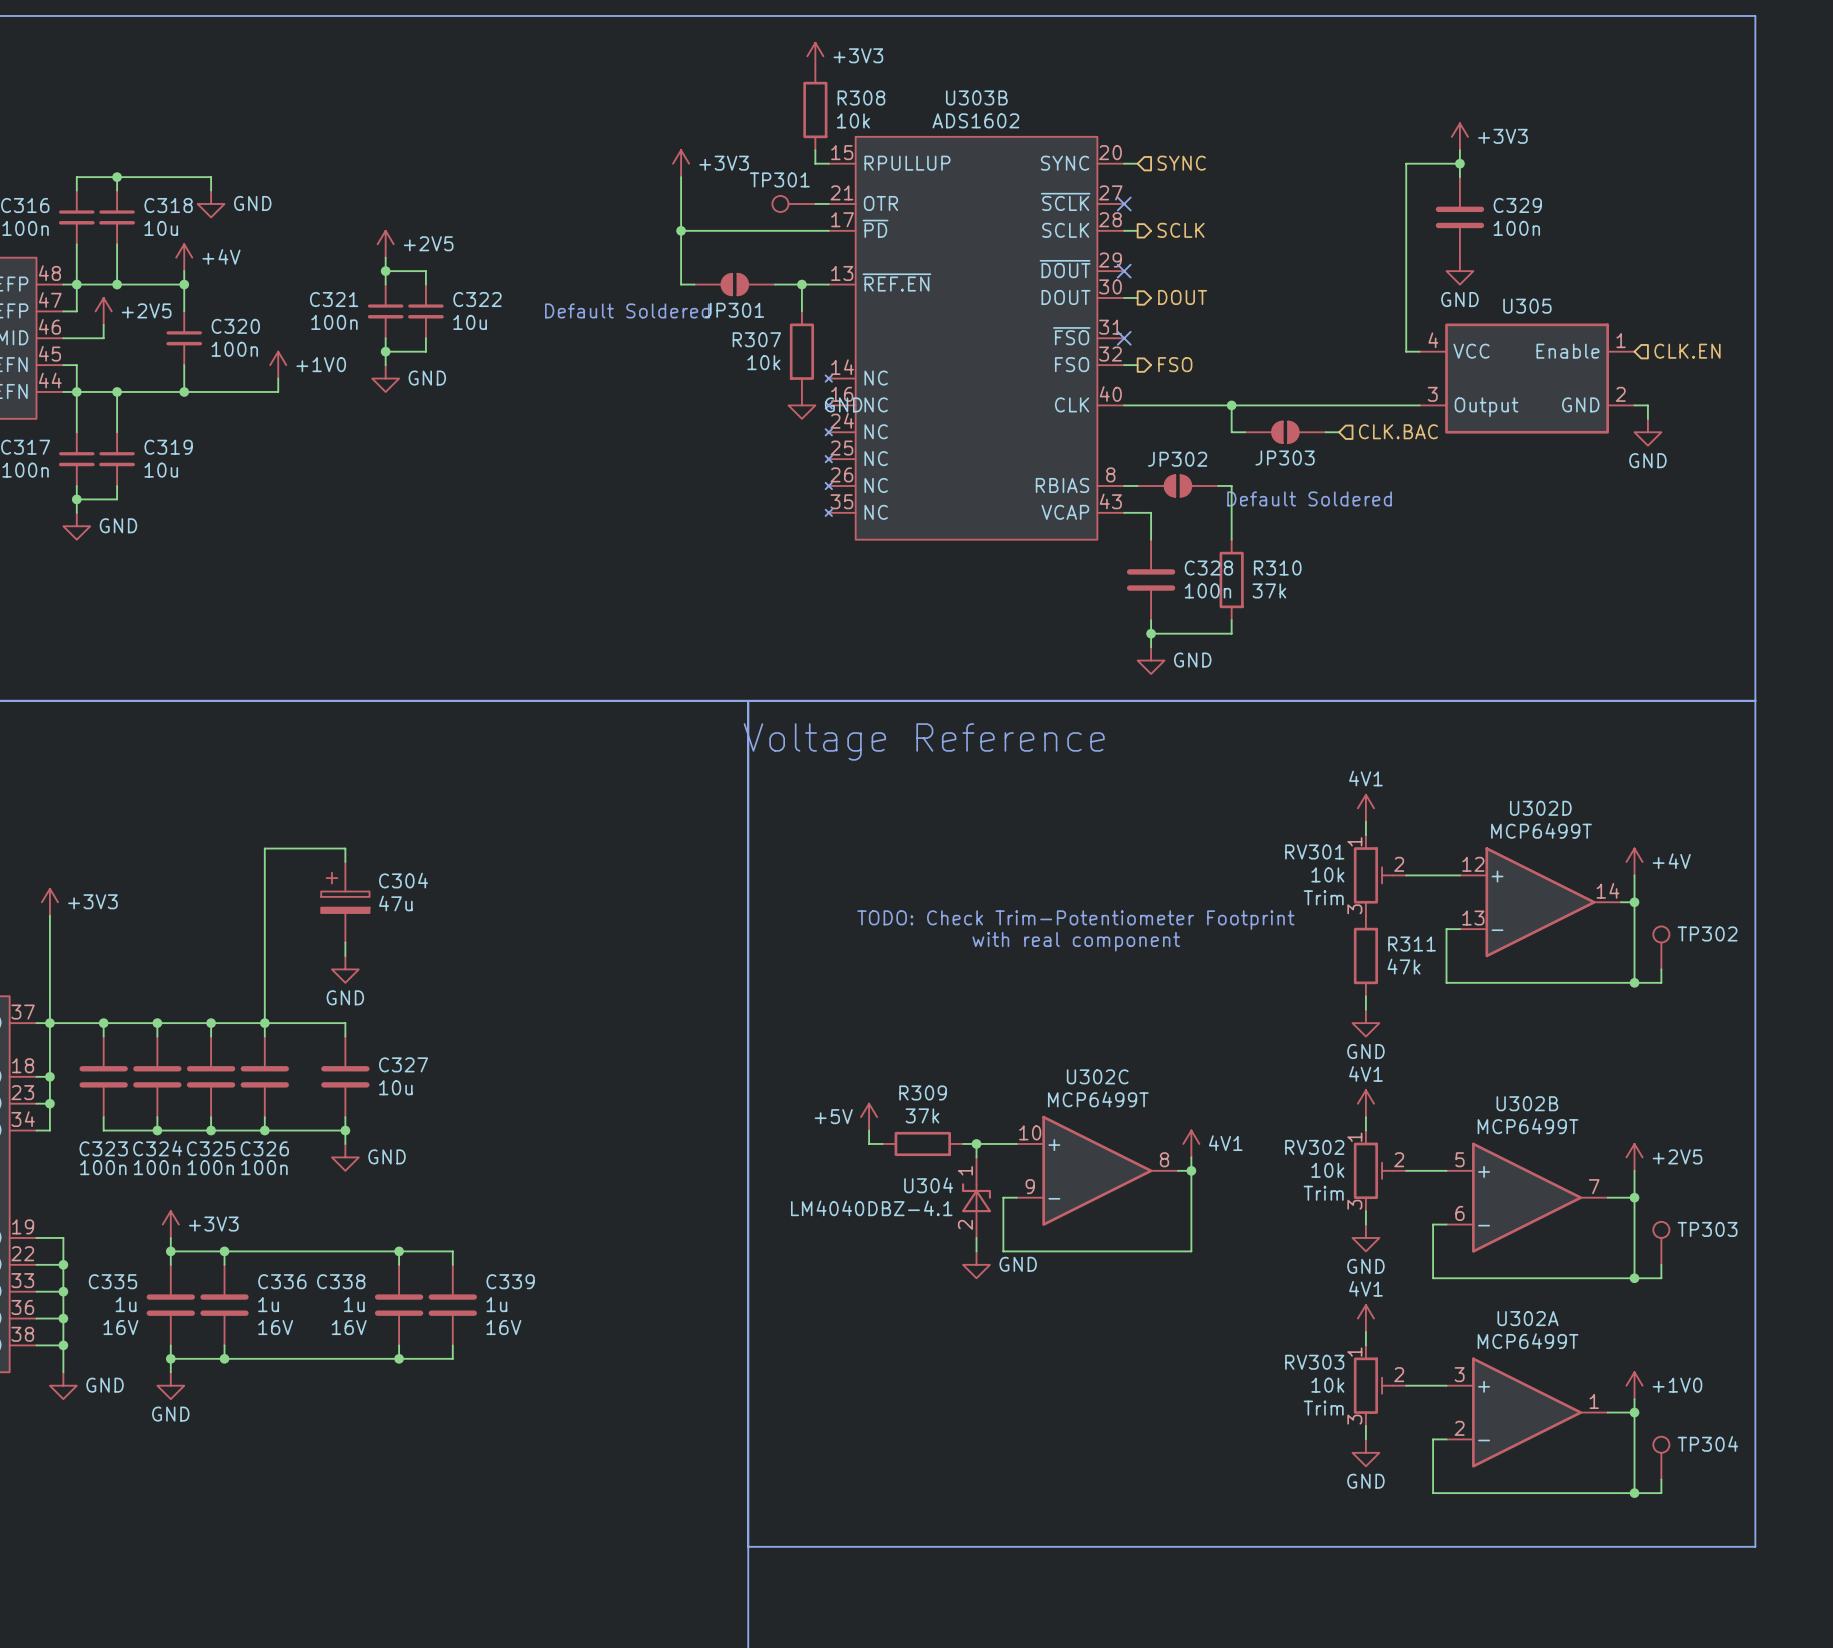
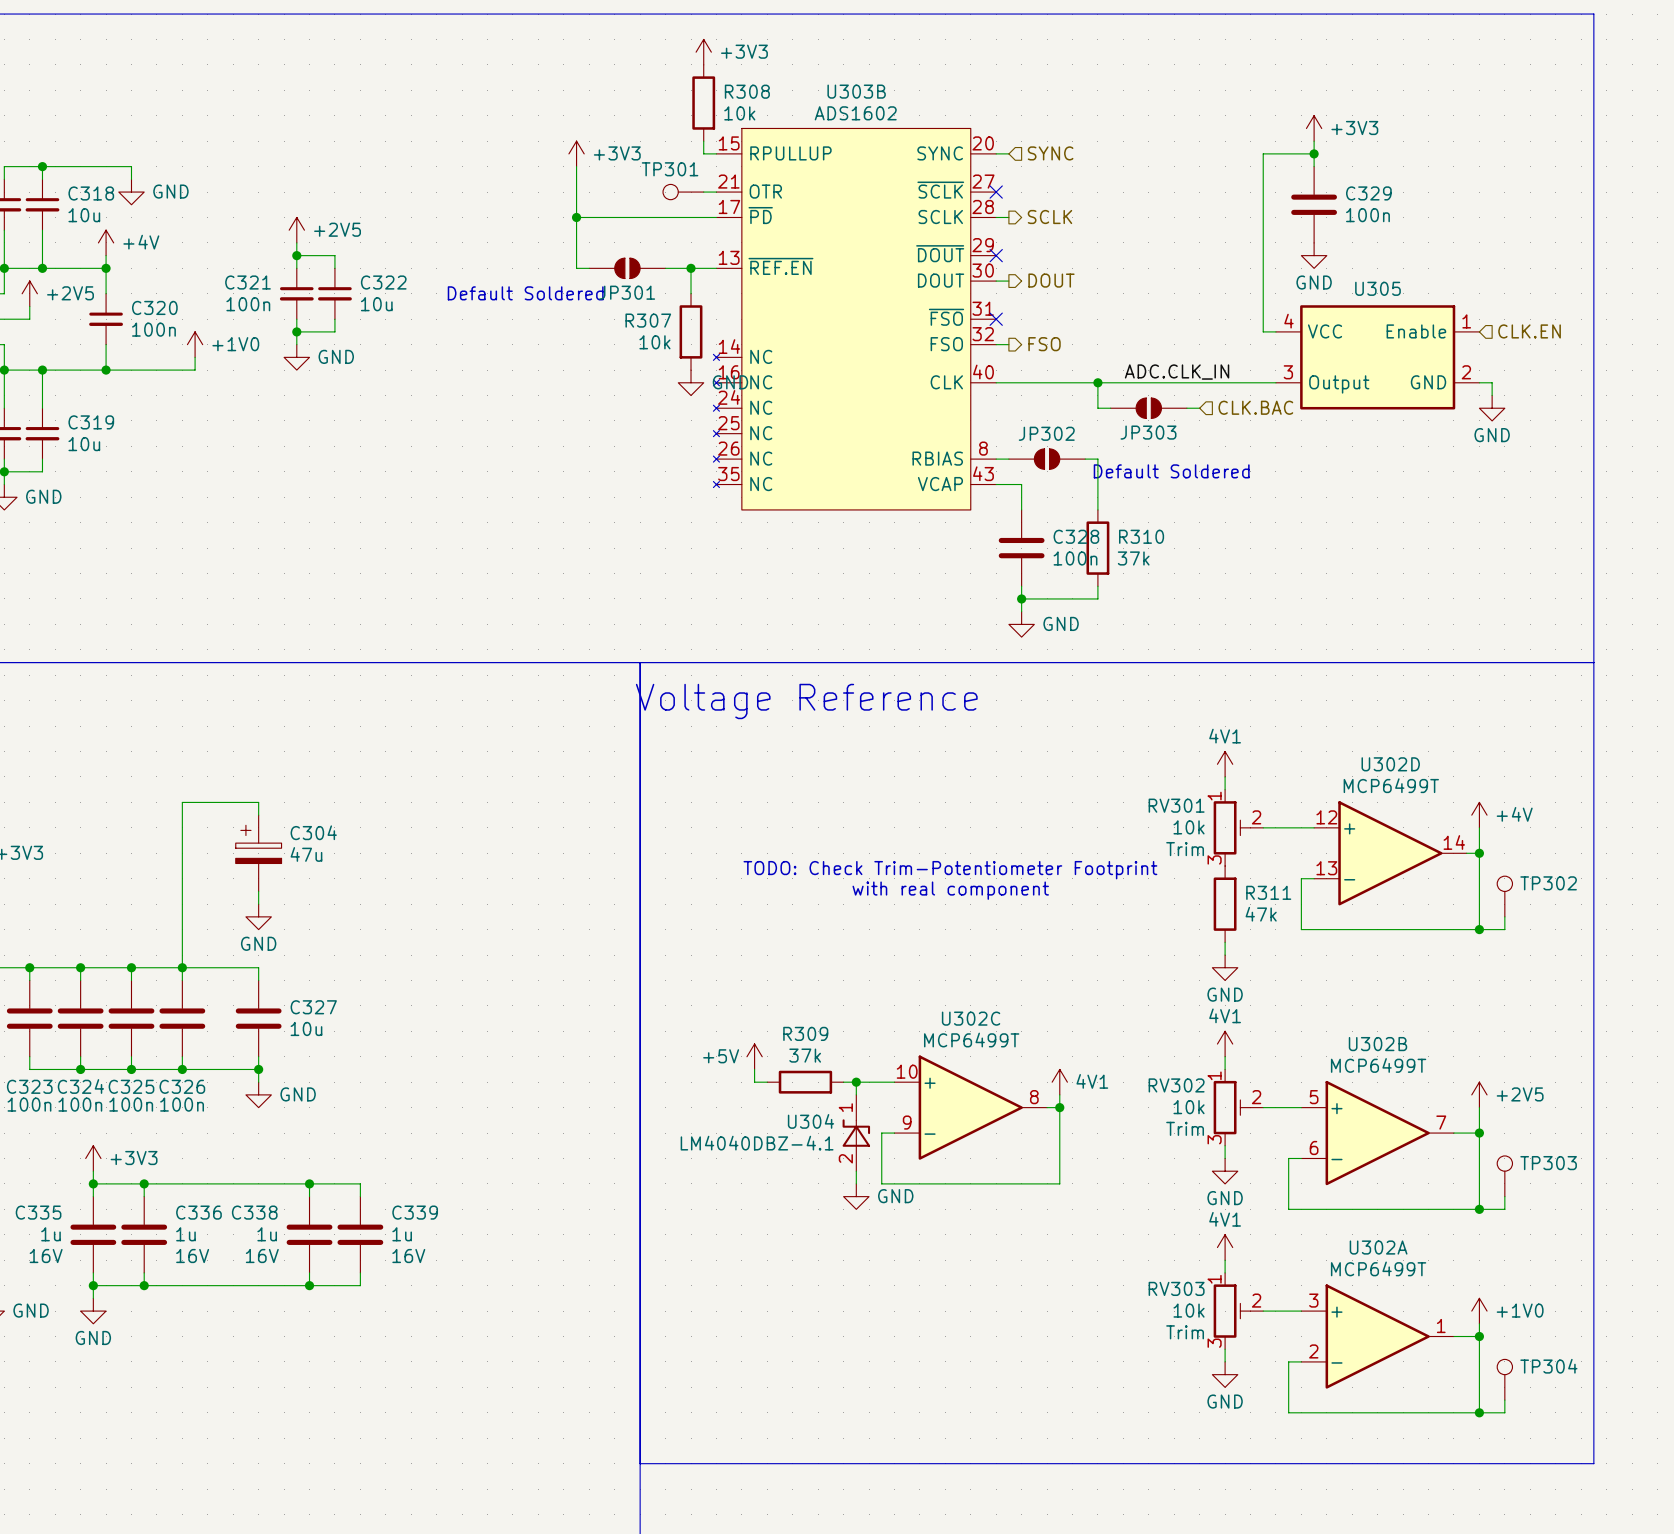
label: none -> ADC.CLK_IN (1177, 372)

